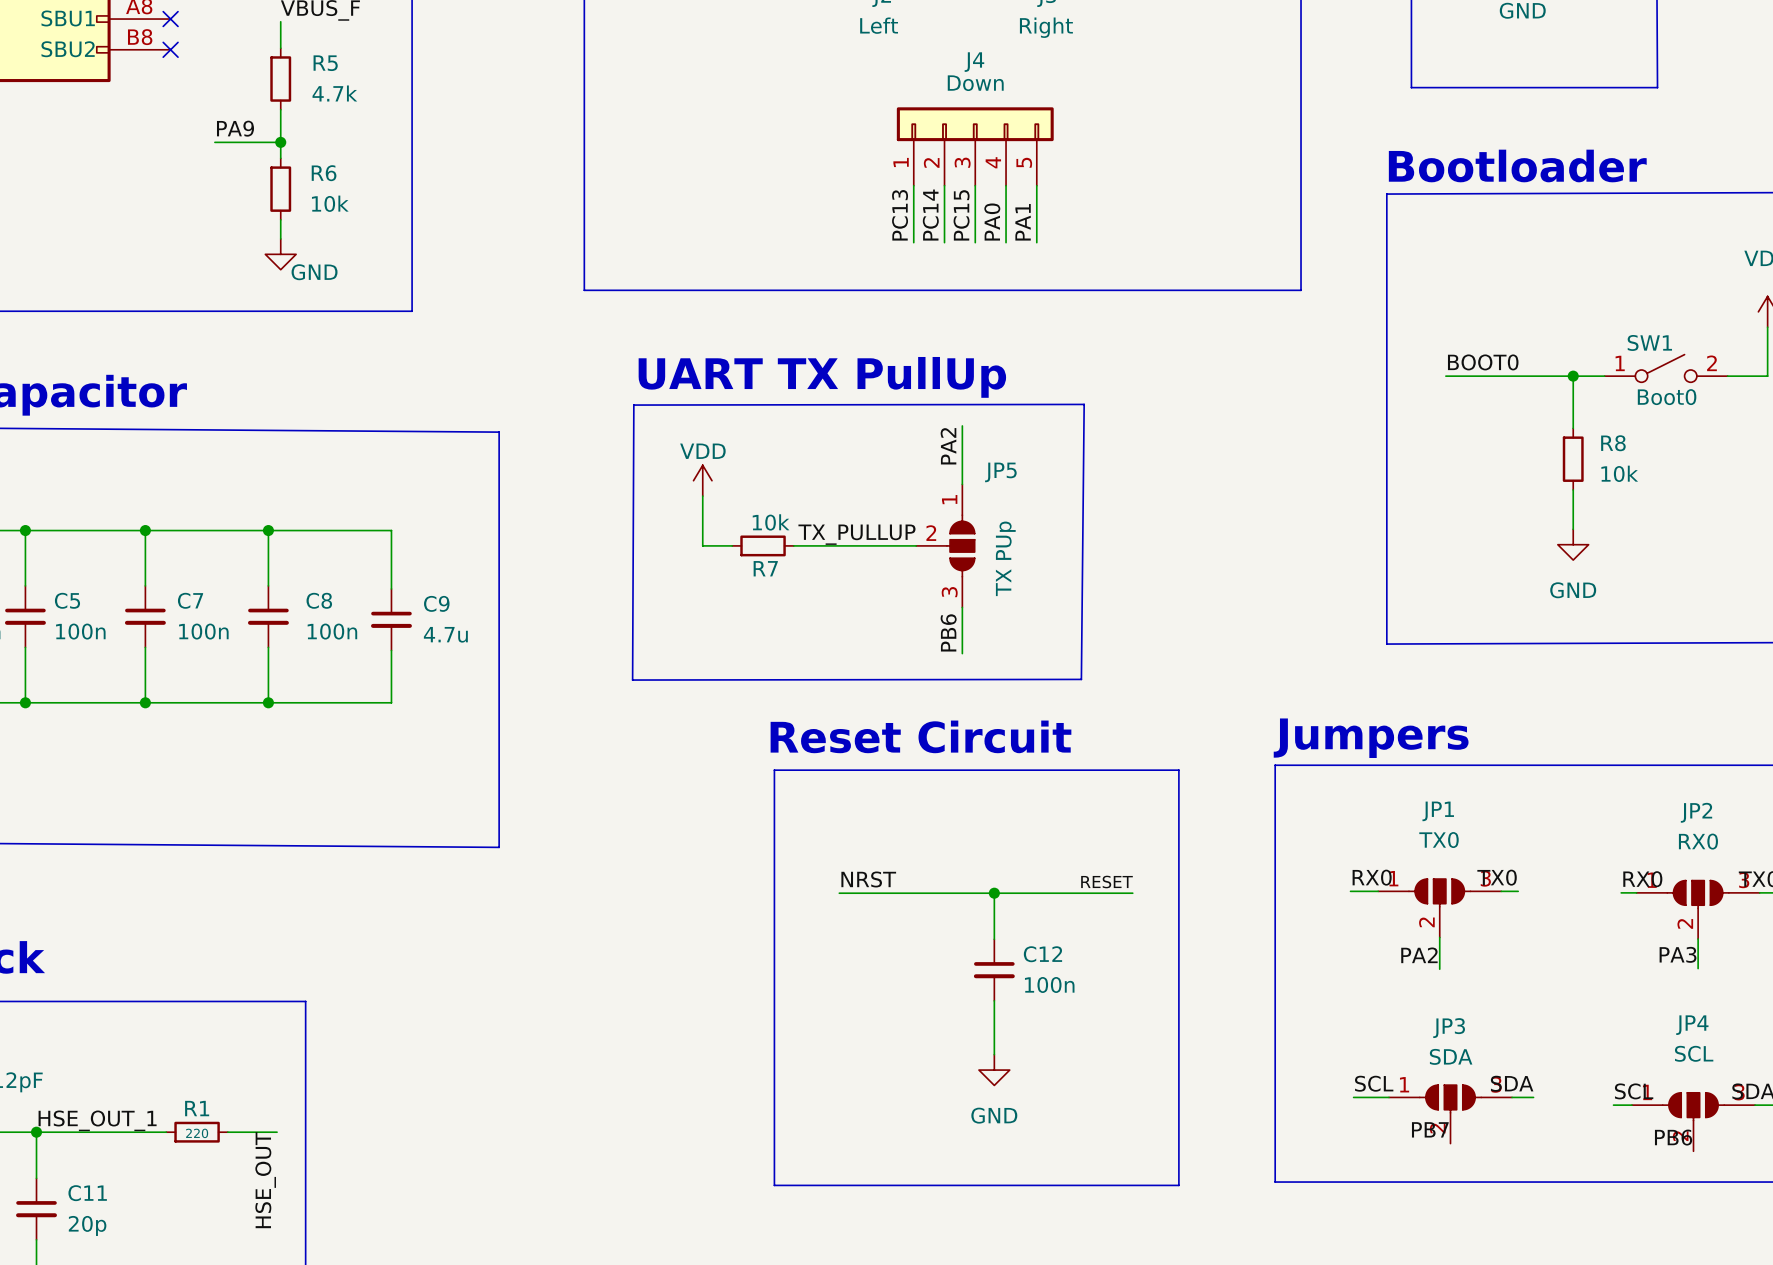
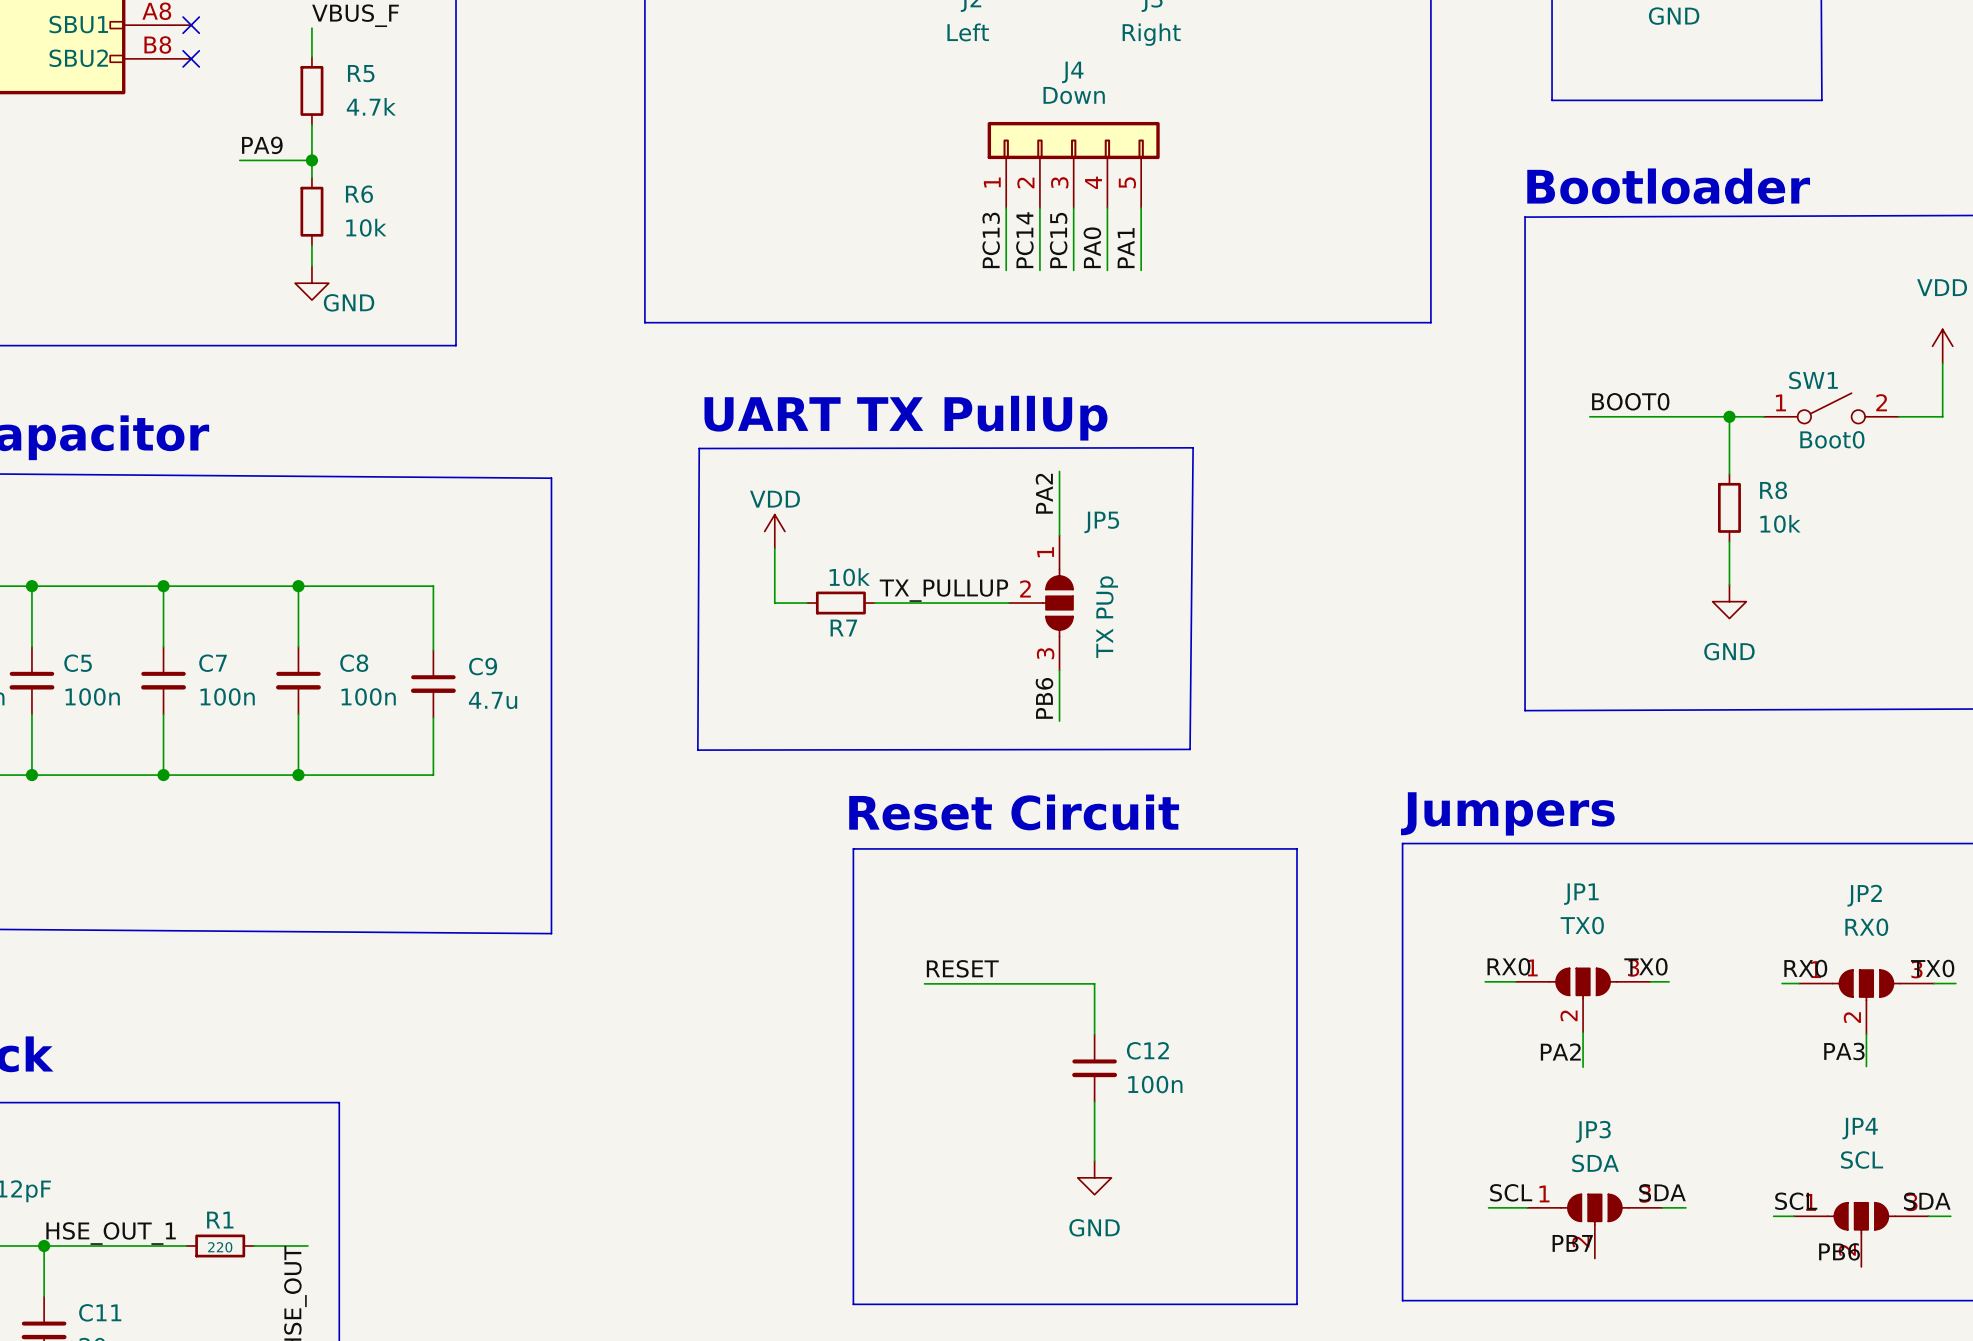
label: NRST (868, 879) -> RESET (962, 968)
label: RESET (1106, 882) -> none
wire: (994, 893) (1132, 893) -> none
junction: (994, 893) -> none

